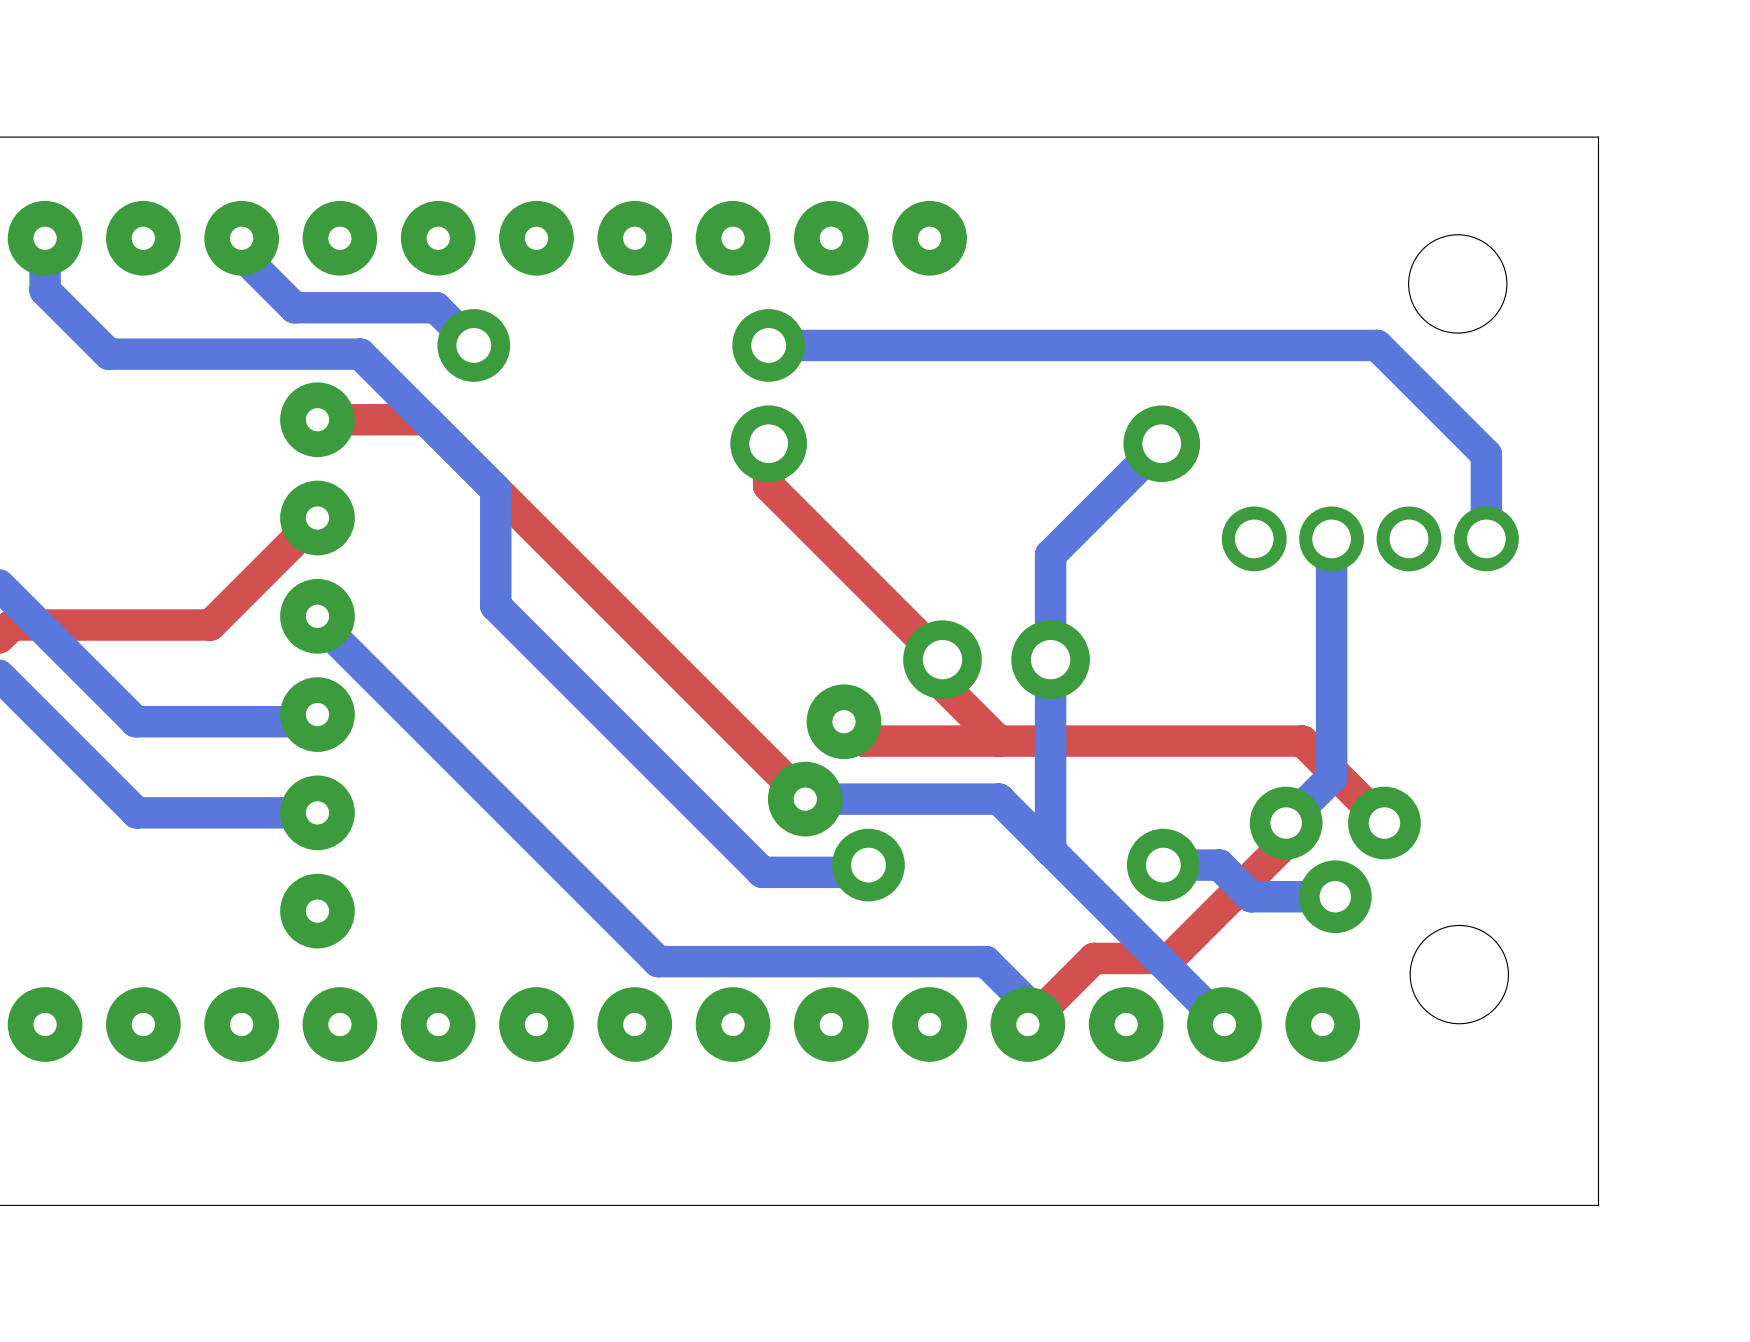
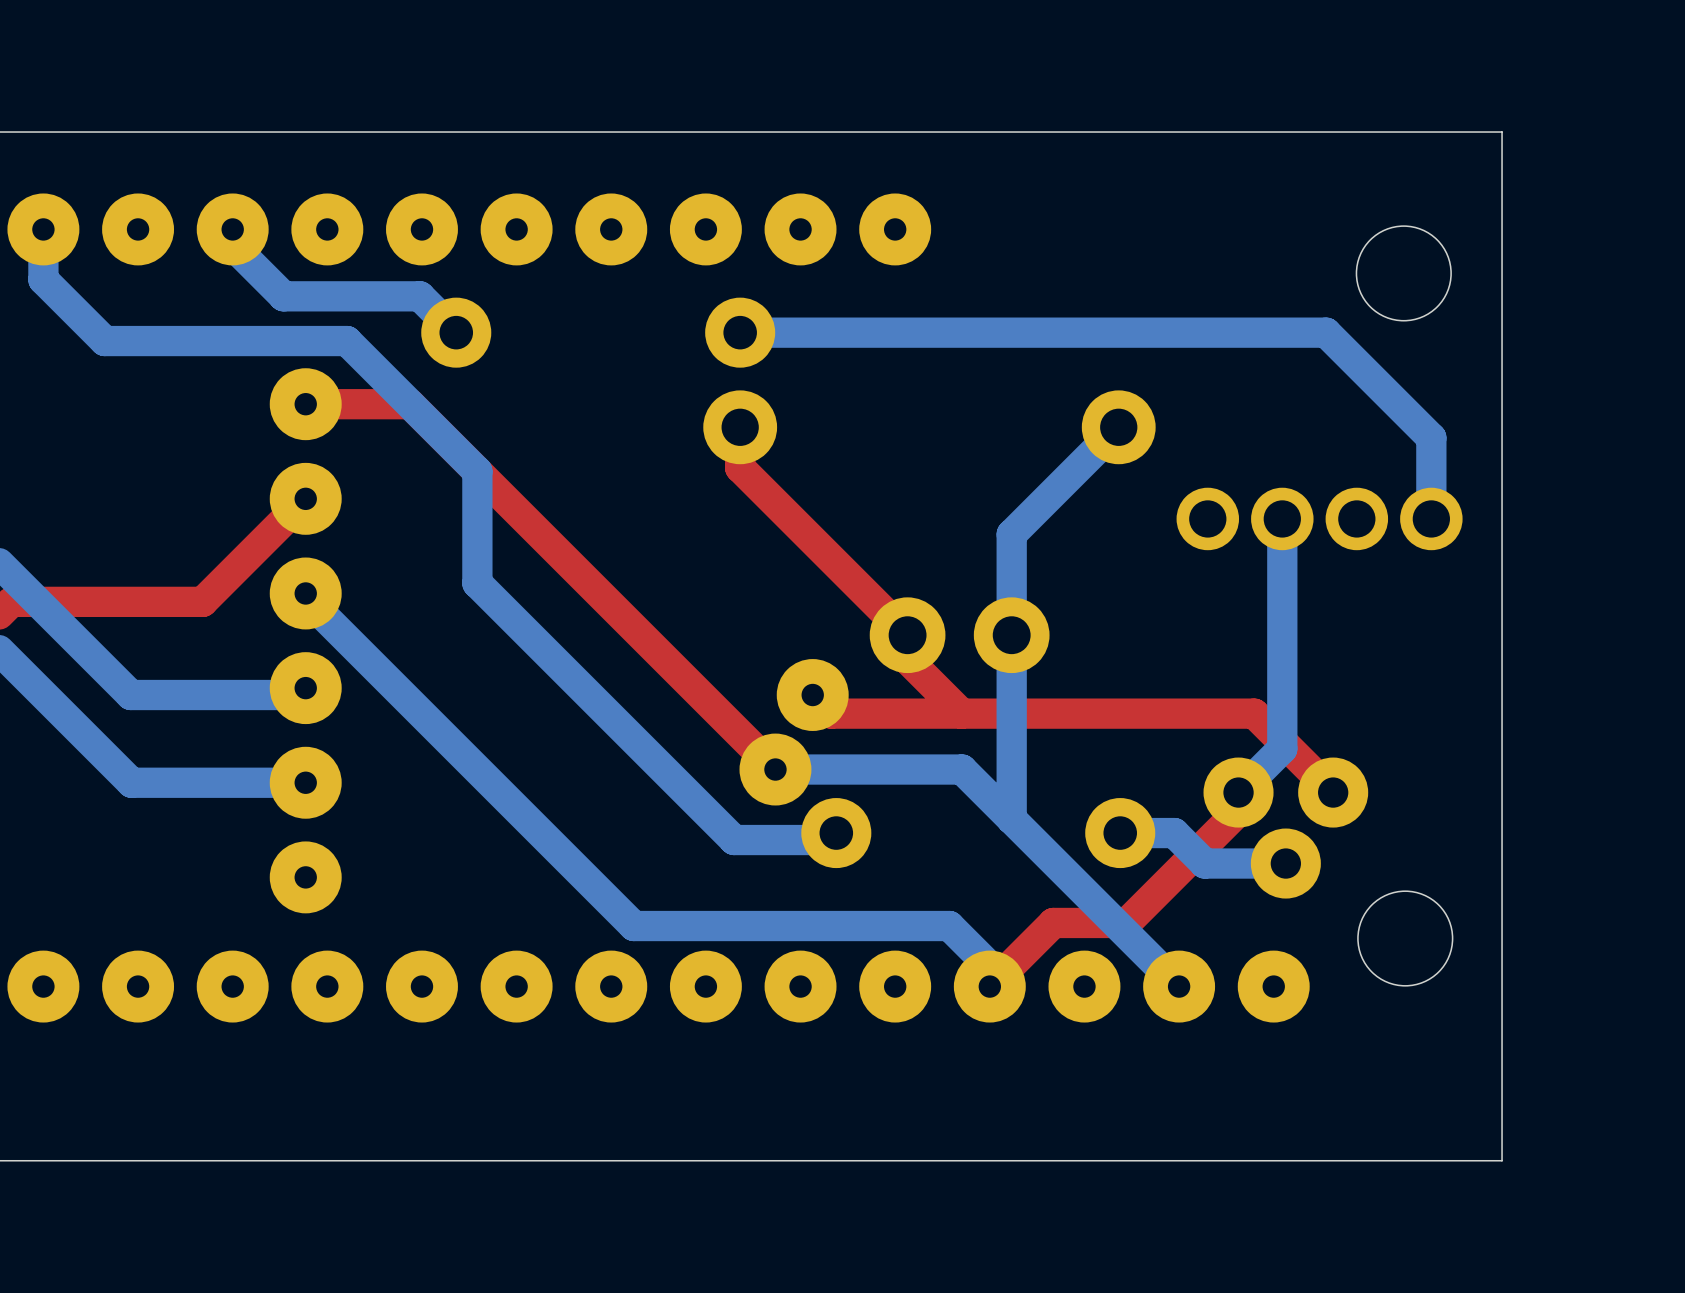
board edge: (1559, 137) (1598, 137) (1598, 1205) (1559, 1205) -> (1502, 132) (1502, 1160)

